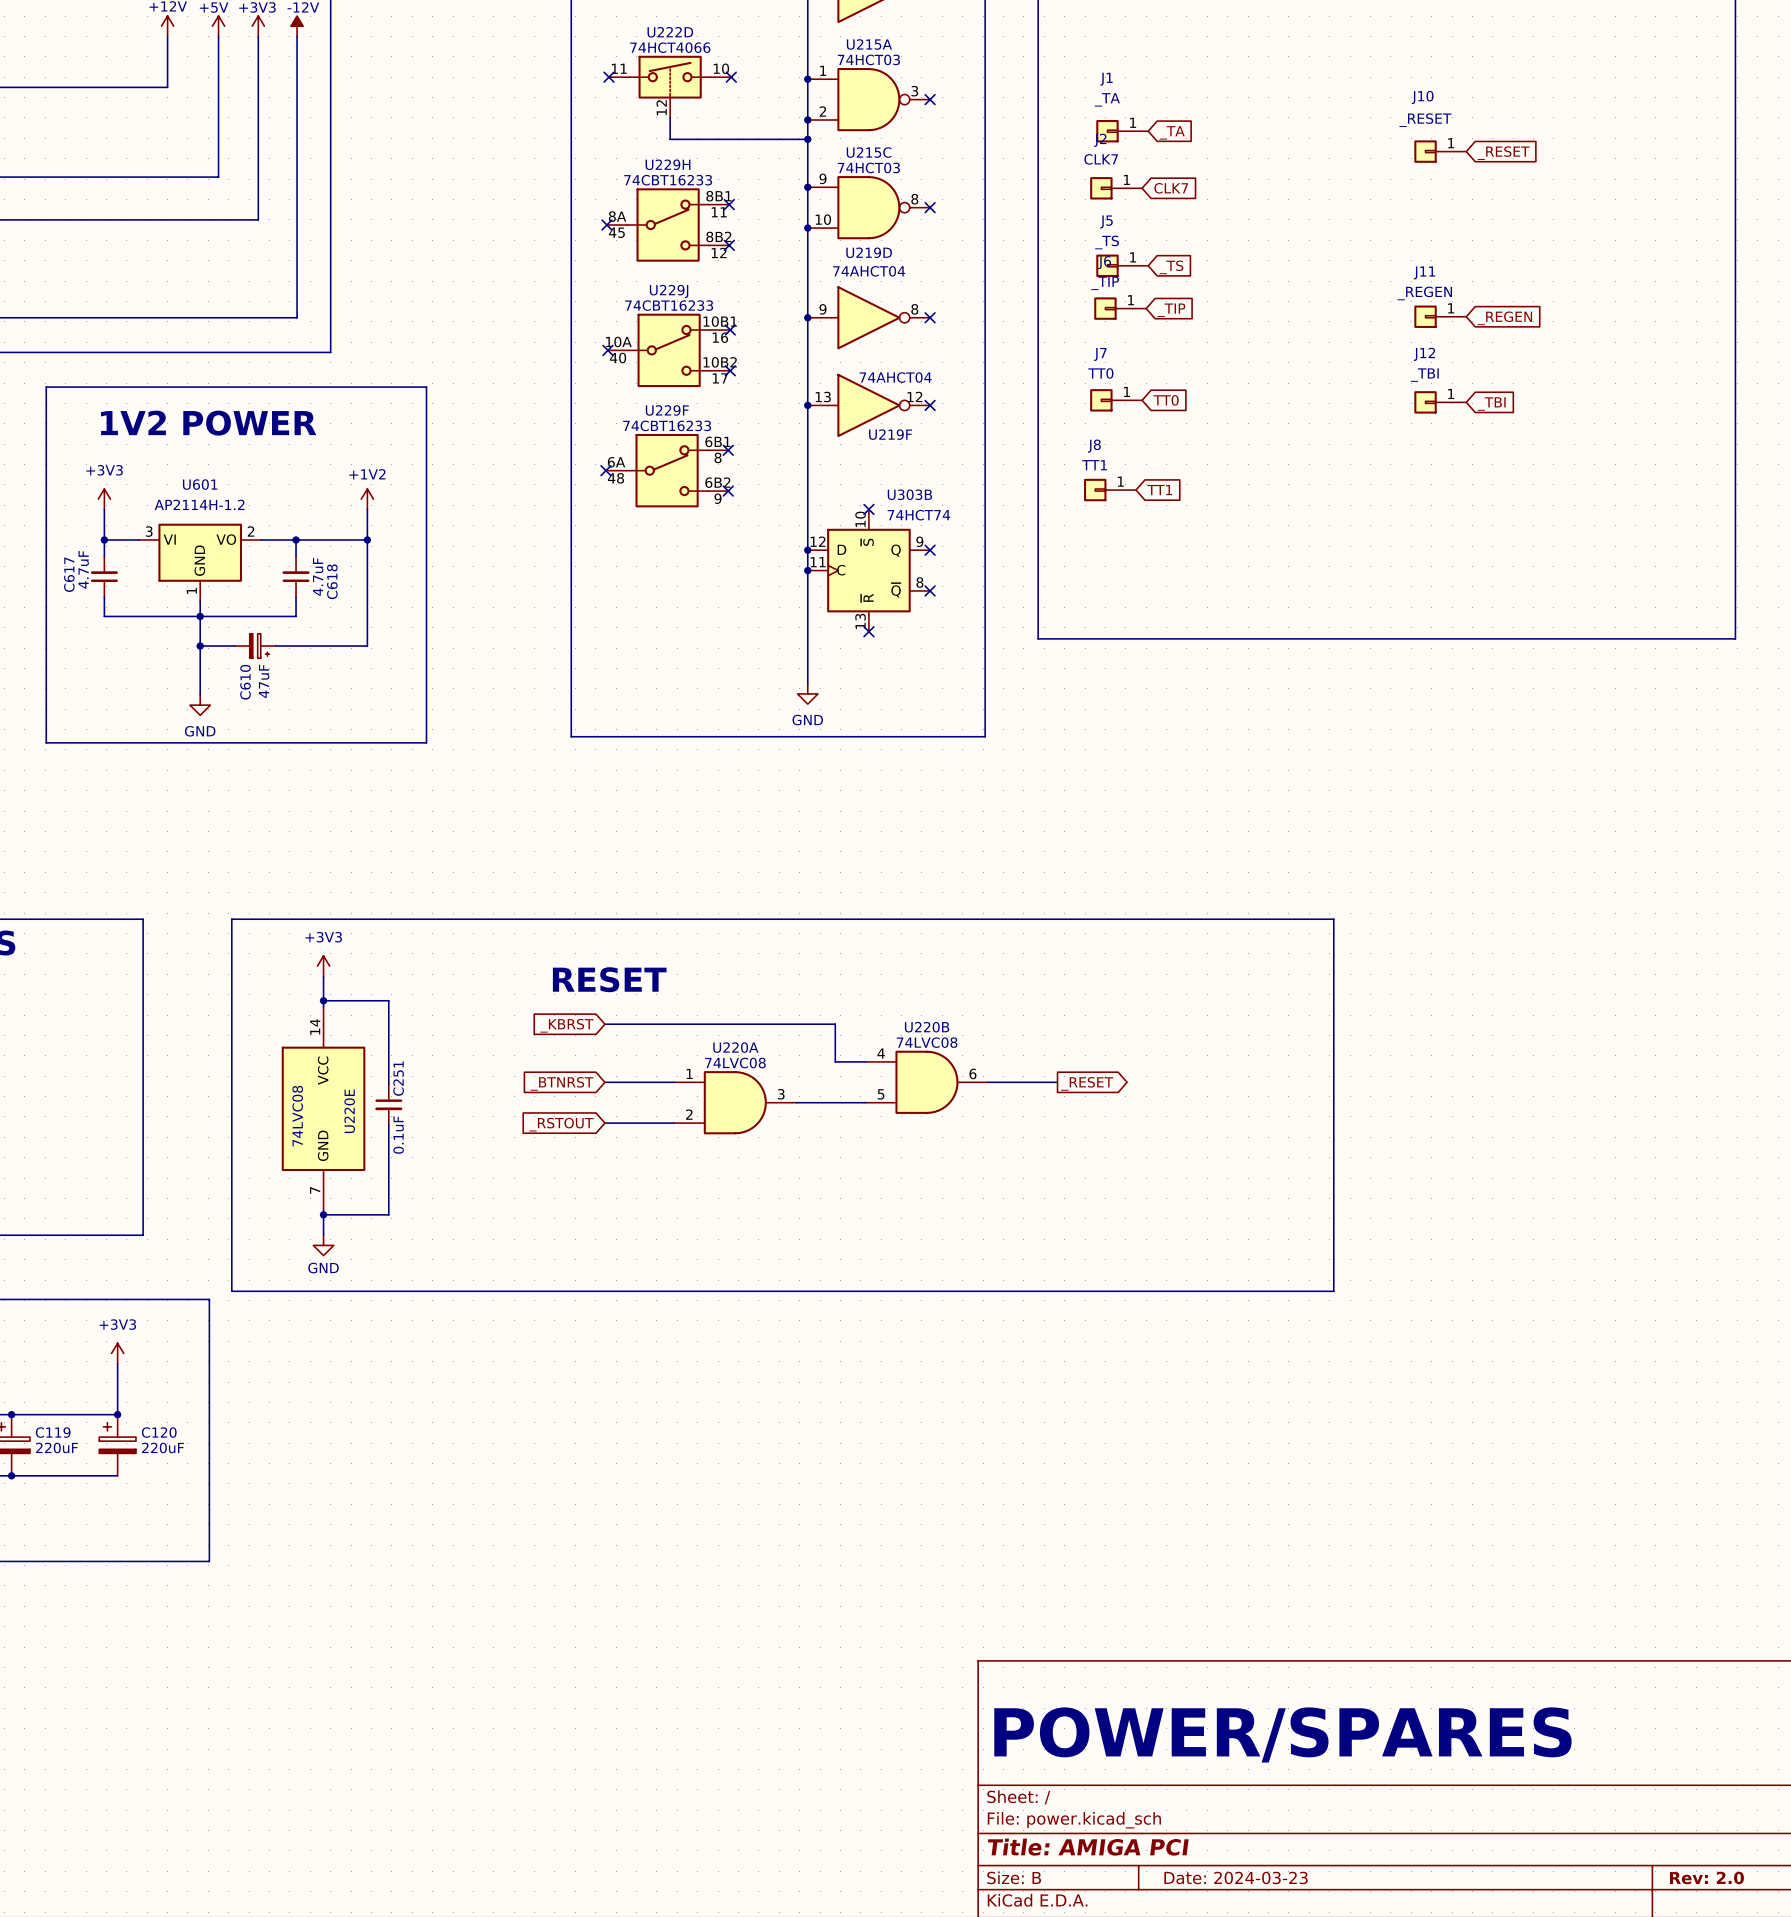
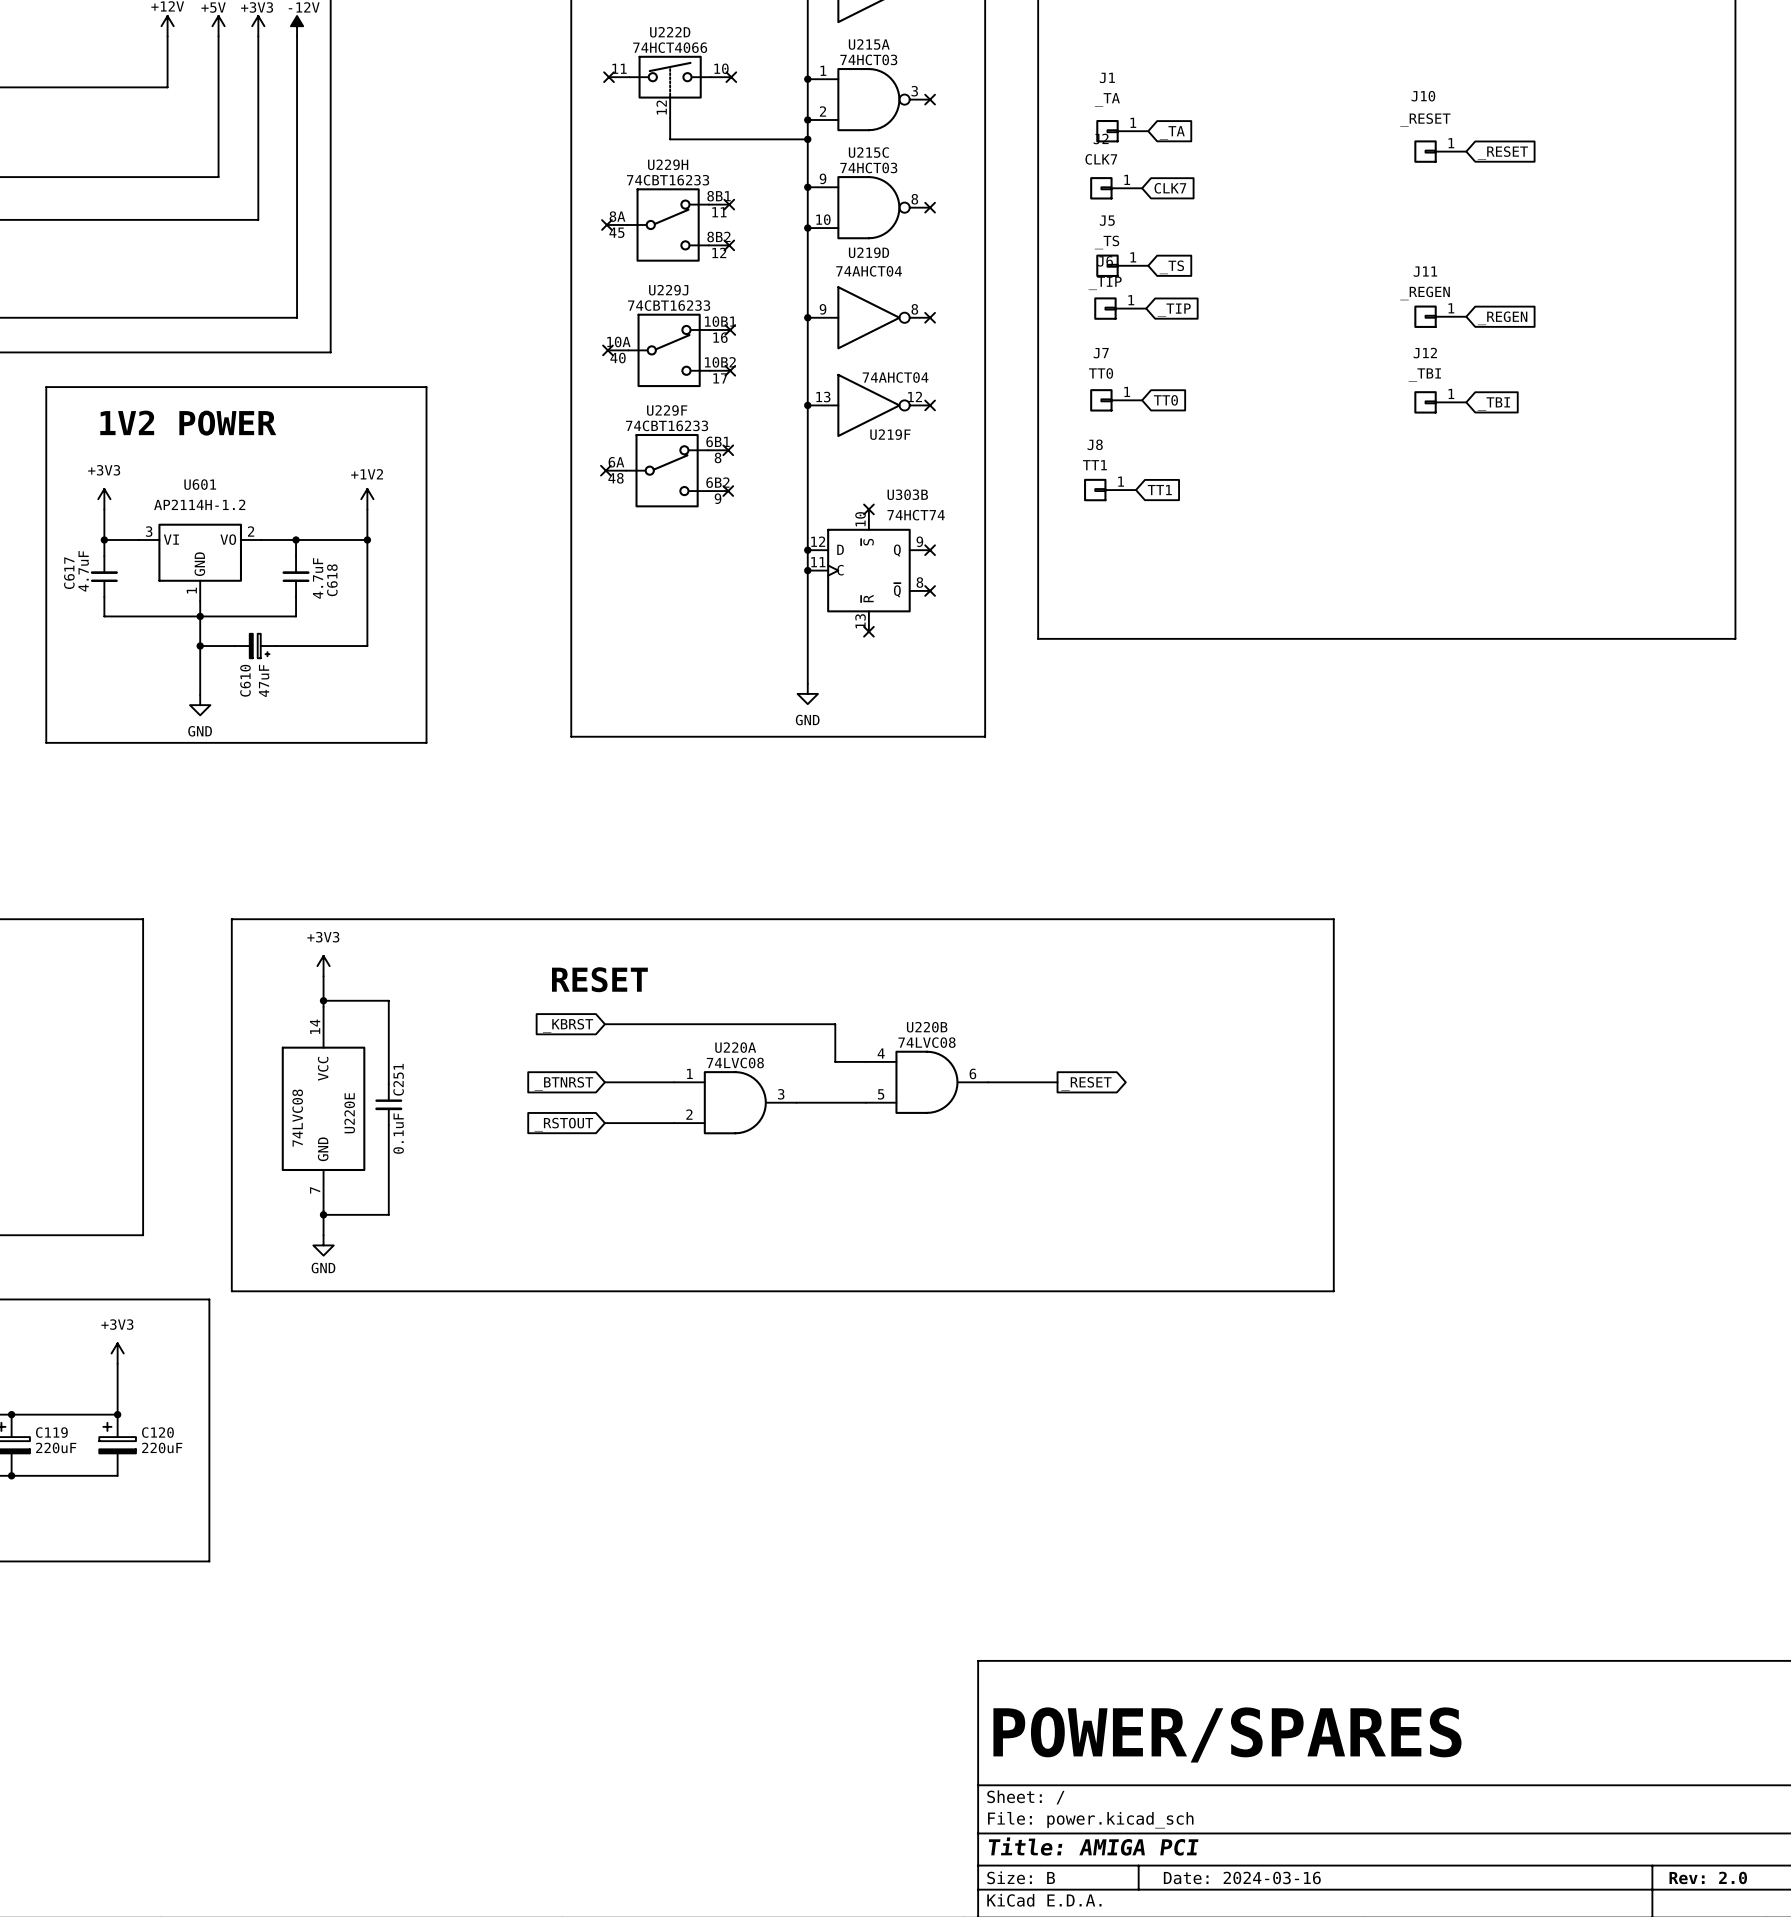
title block: Date: 2024-03-23 (1236, 1877) -> Date: 2024-03-16 (1242, 1877)

